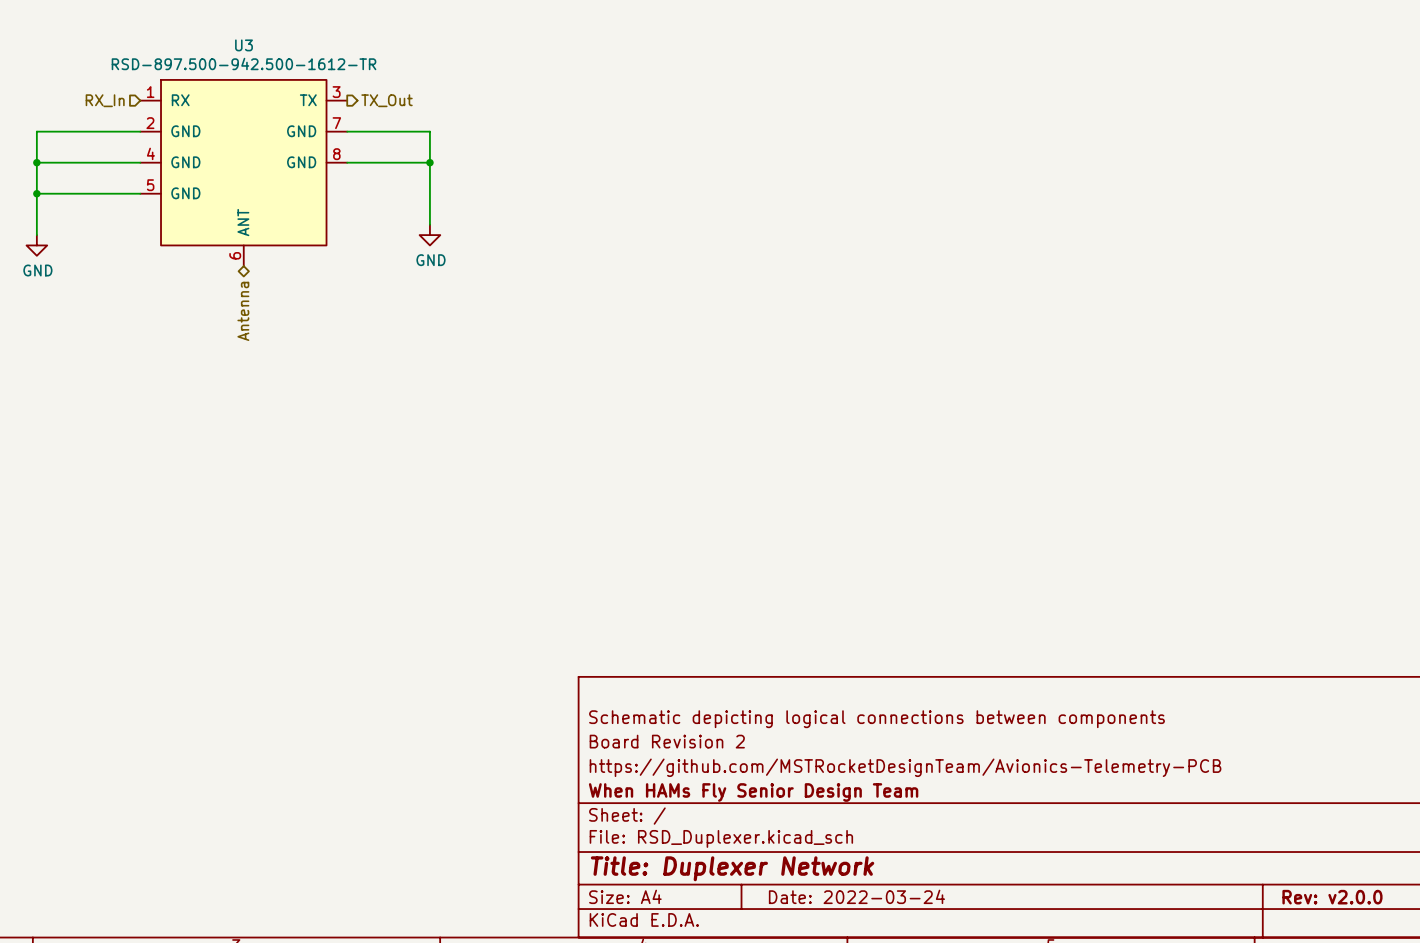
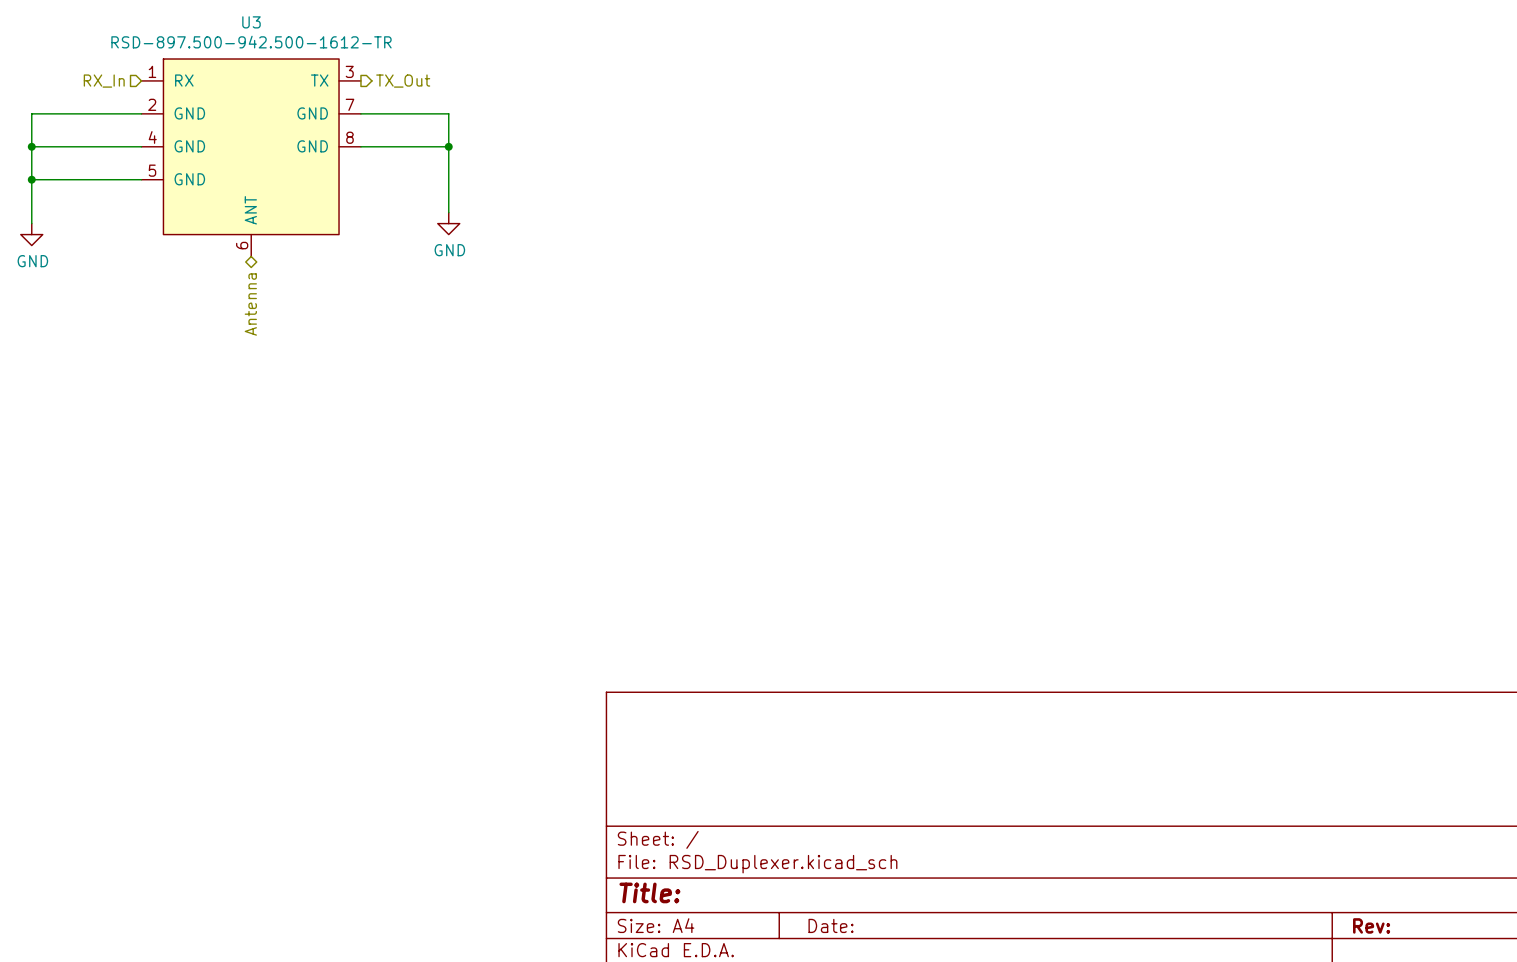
title block: Schematic depicting logical connections between components (877, 719) -> none
title block: Board Revision 2 (667, 741) -> none
title block: https://github.com/MSTRocketDesignTeam/Avionics-Telemetry-PCB (905, 767) -> none
title block: When HAMs Fly Senior Design Team (753, 792) -> none
title block: Title: Duplexer Network (732, 868) -> Title: (649, 892)
title block: Date: 2022-03-24 (856, 896) -> Date: (831, 925)
title block: Rev: v2.0.0 (1332, 897) -> Rev: (1371, 925)

